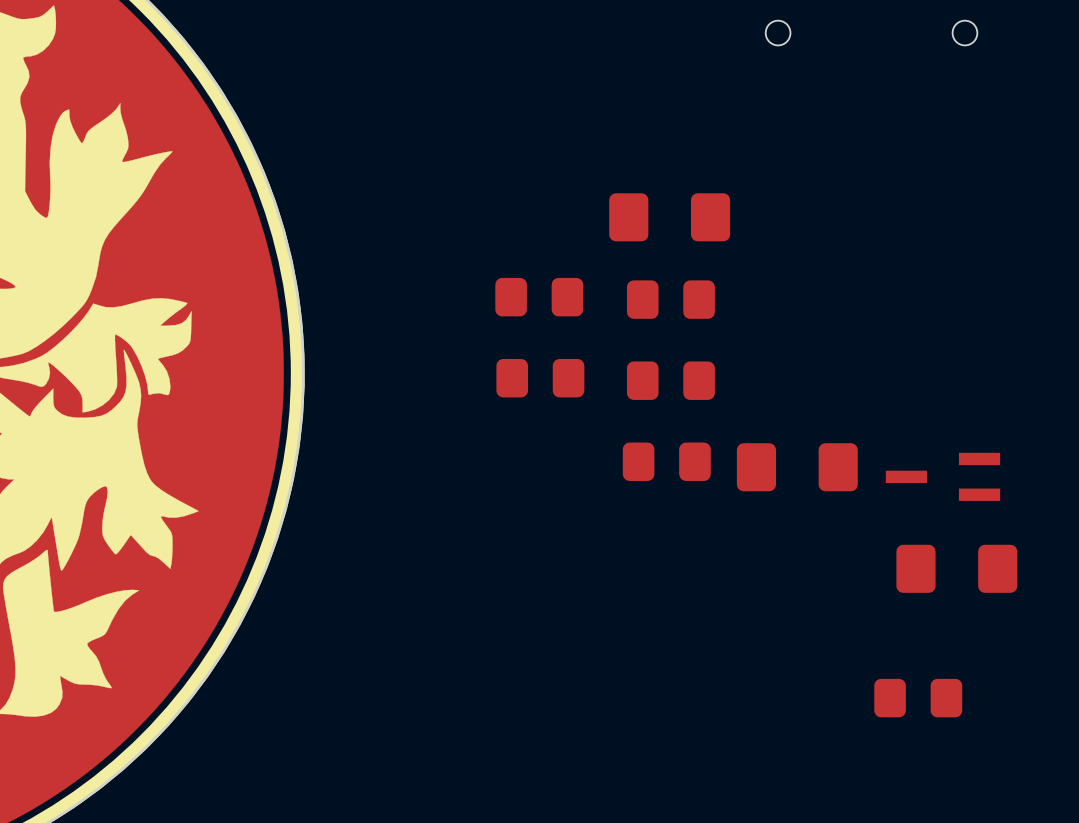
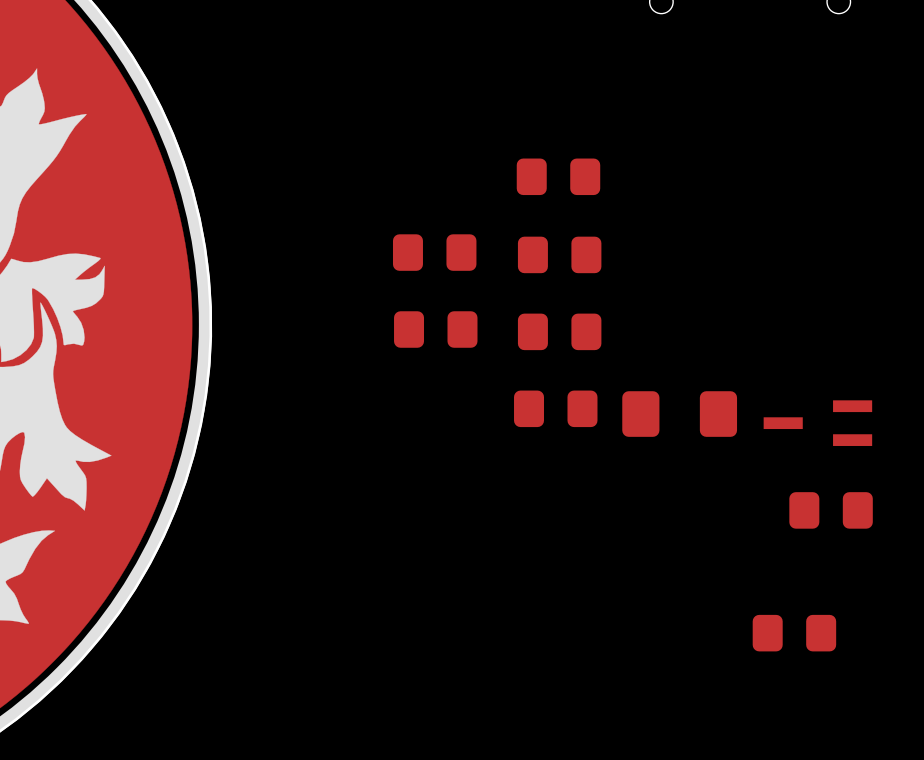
part footprint: [609, 193, 731, 242] -> [516, 158, 601, 196]
part footprint: [896, 544, 1018, 593] -> [789, 492, 873, 529]

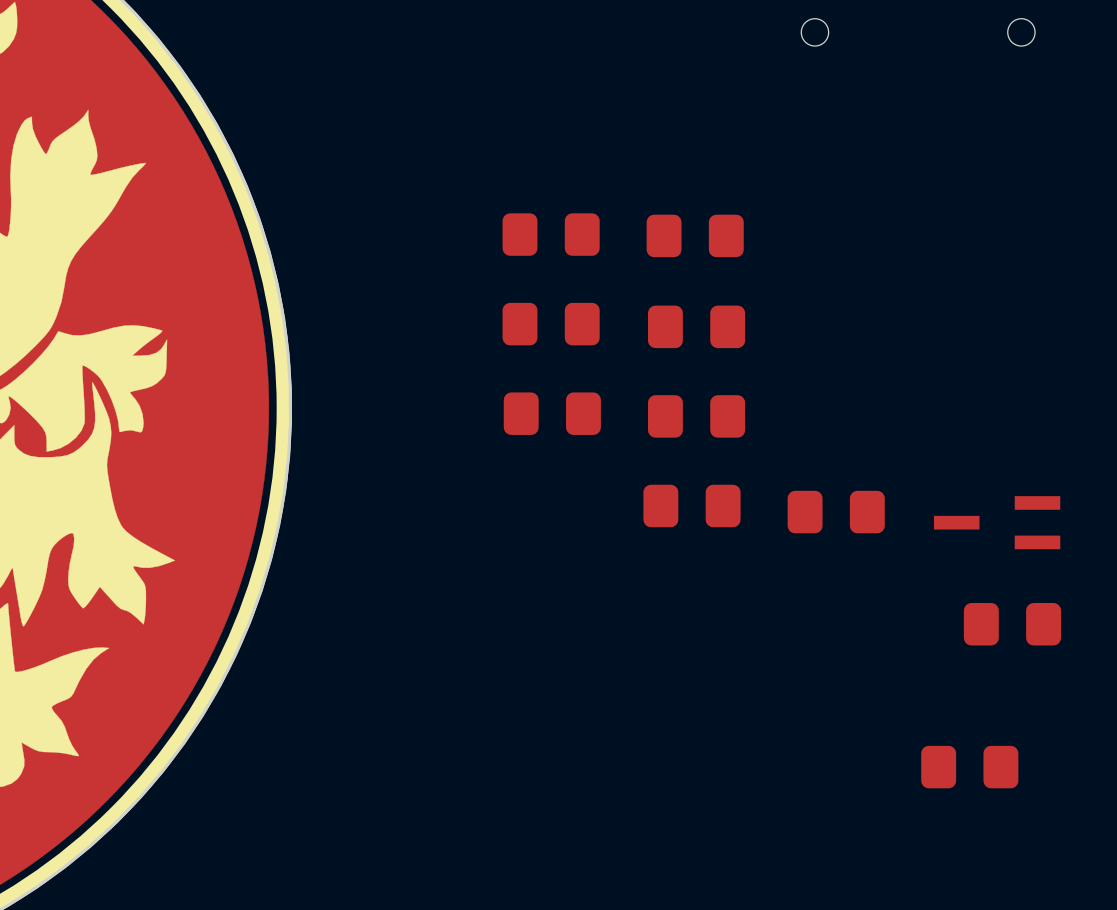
part: none -> (551, 234)
part footprint: [622, 391, 738, 437] -> [787, 490, 885, 534]

